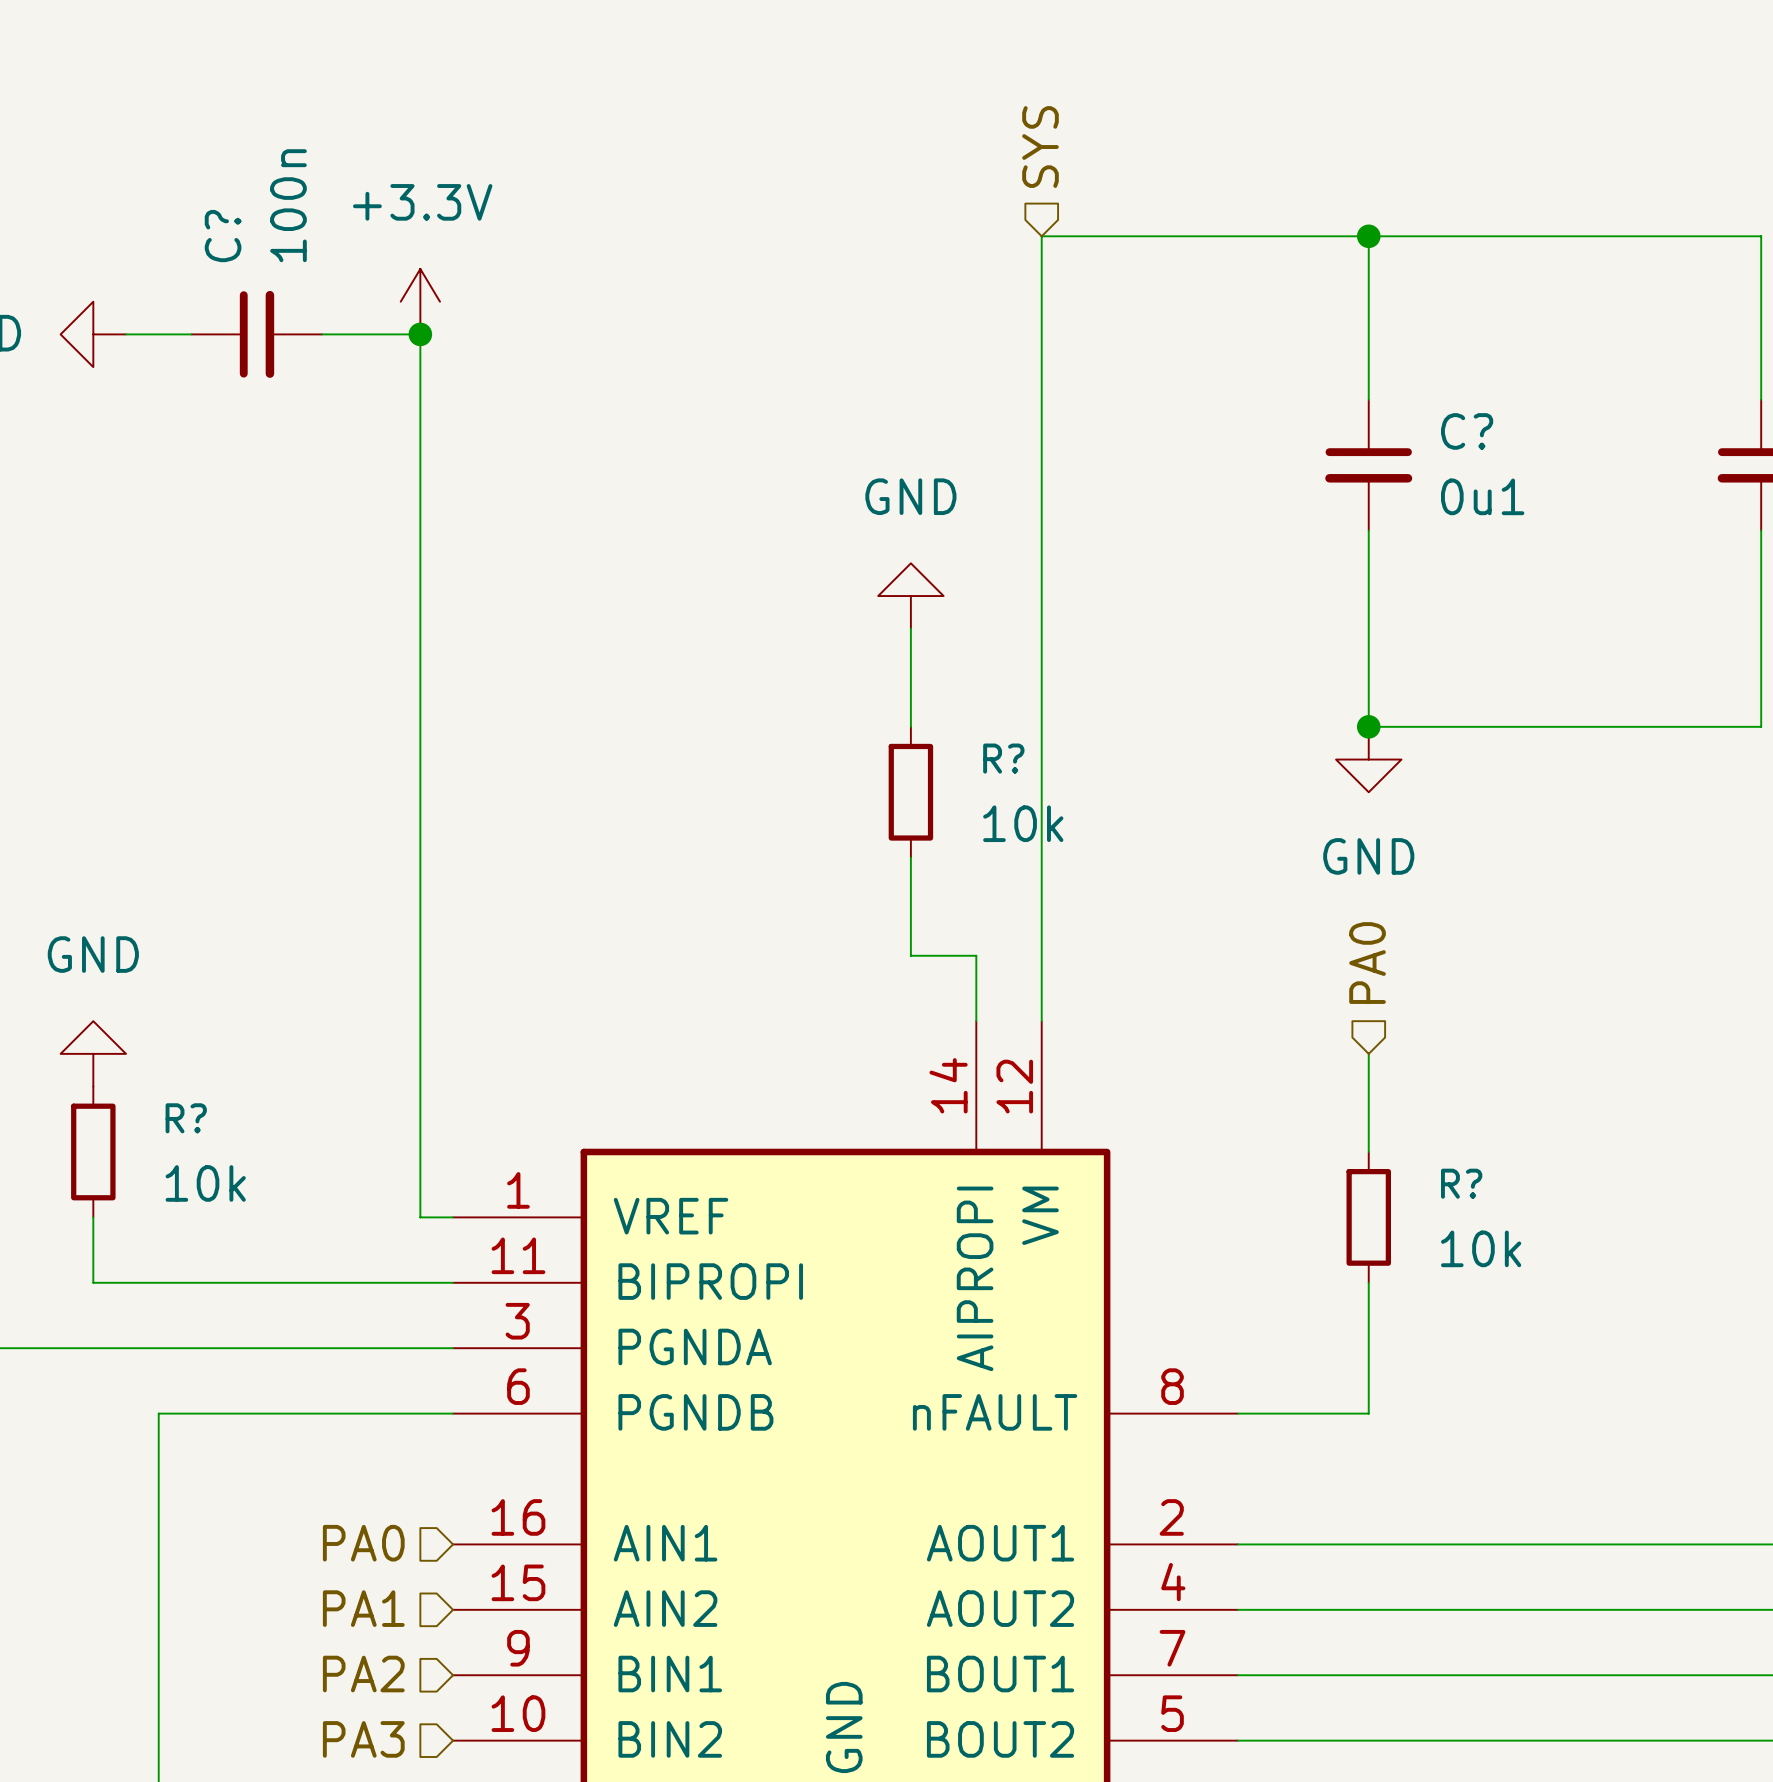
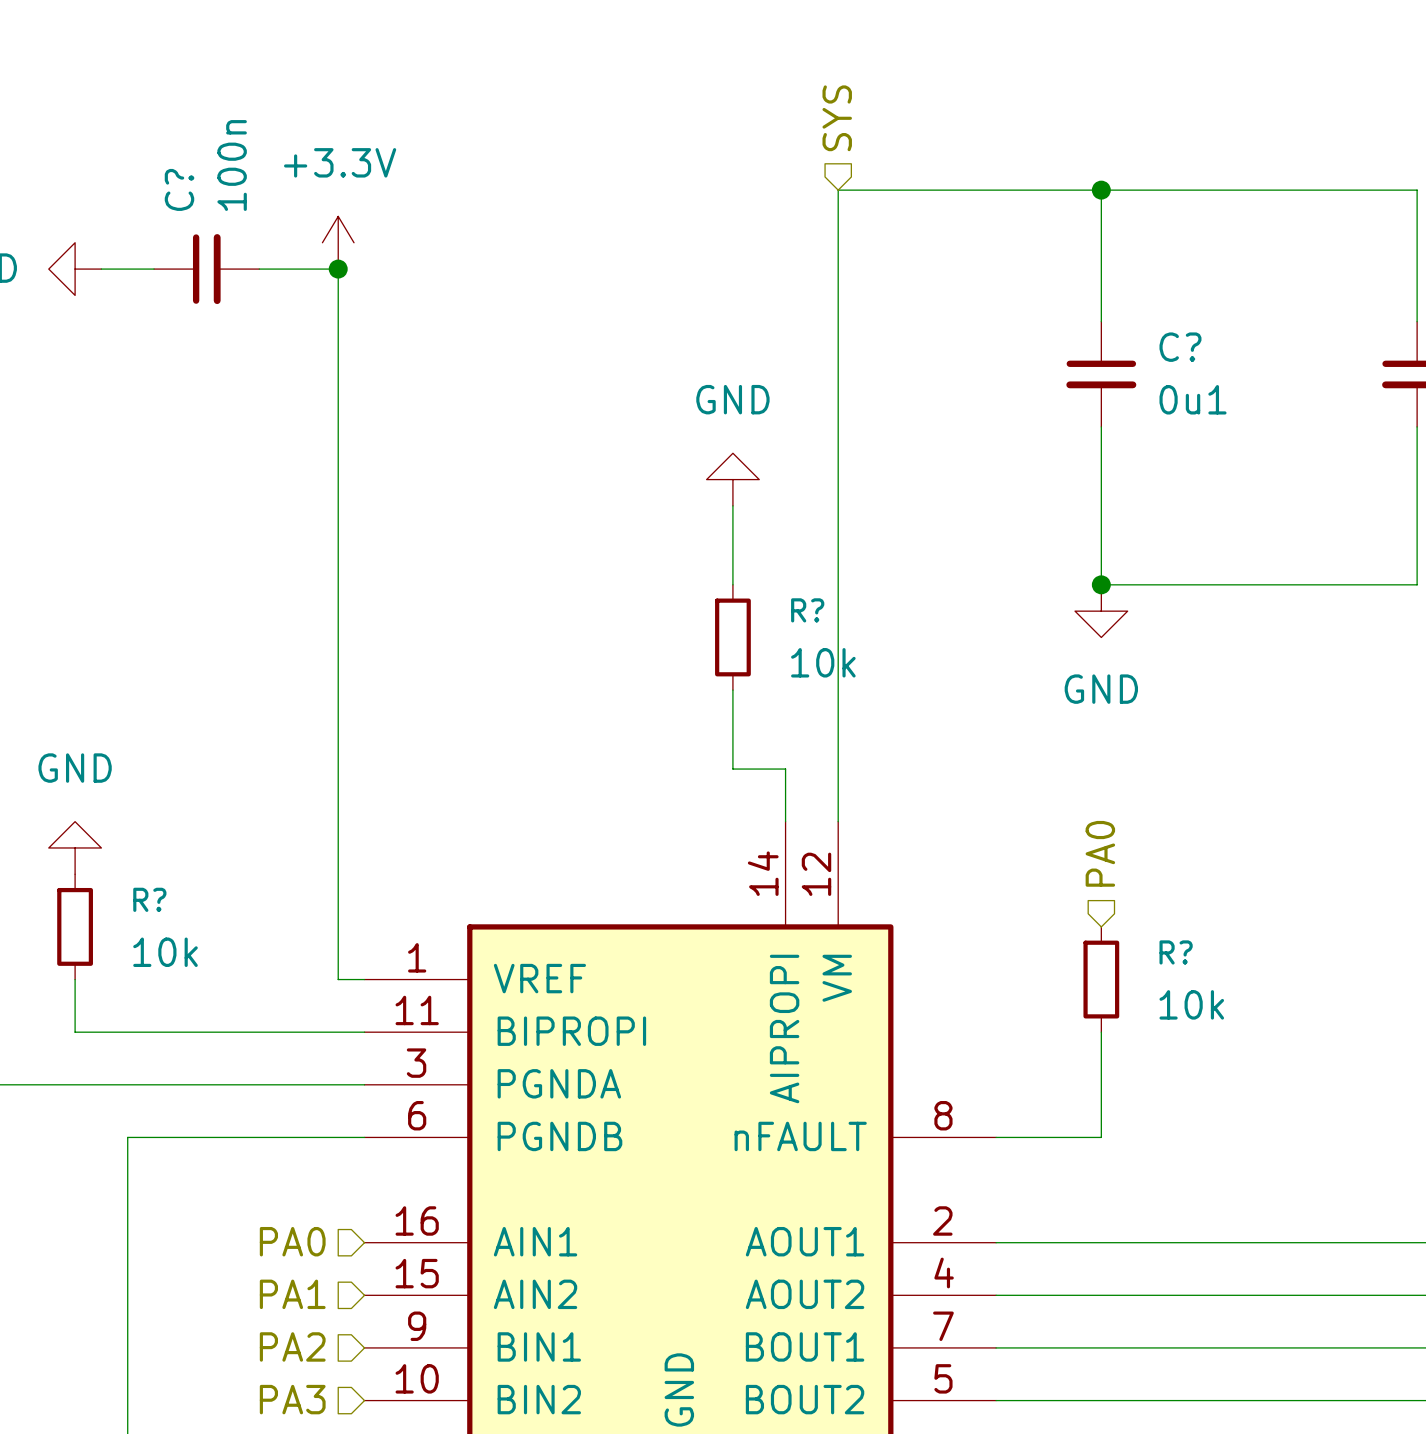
hierarchical label position: PA0 (1367, 963) -> PA0 (1100, 853)
wire: (1368, 1053) (1368, 1151) -> none

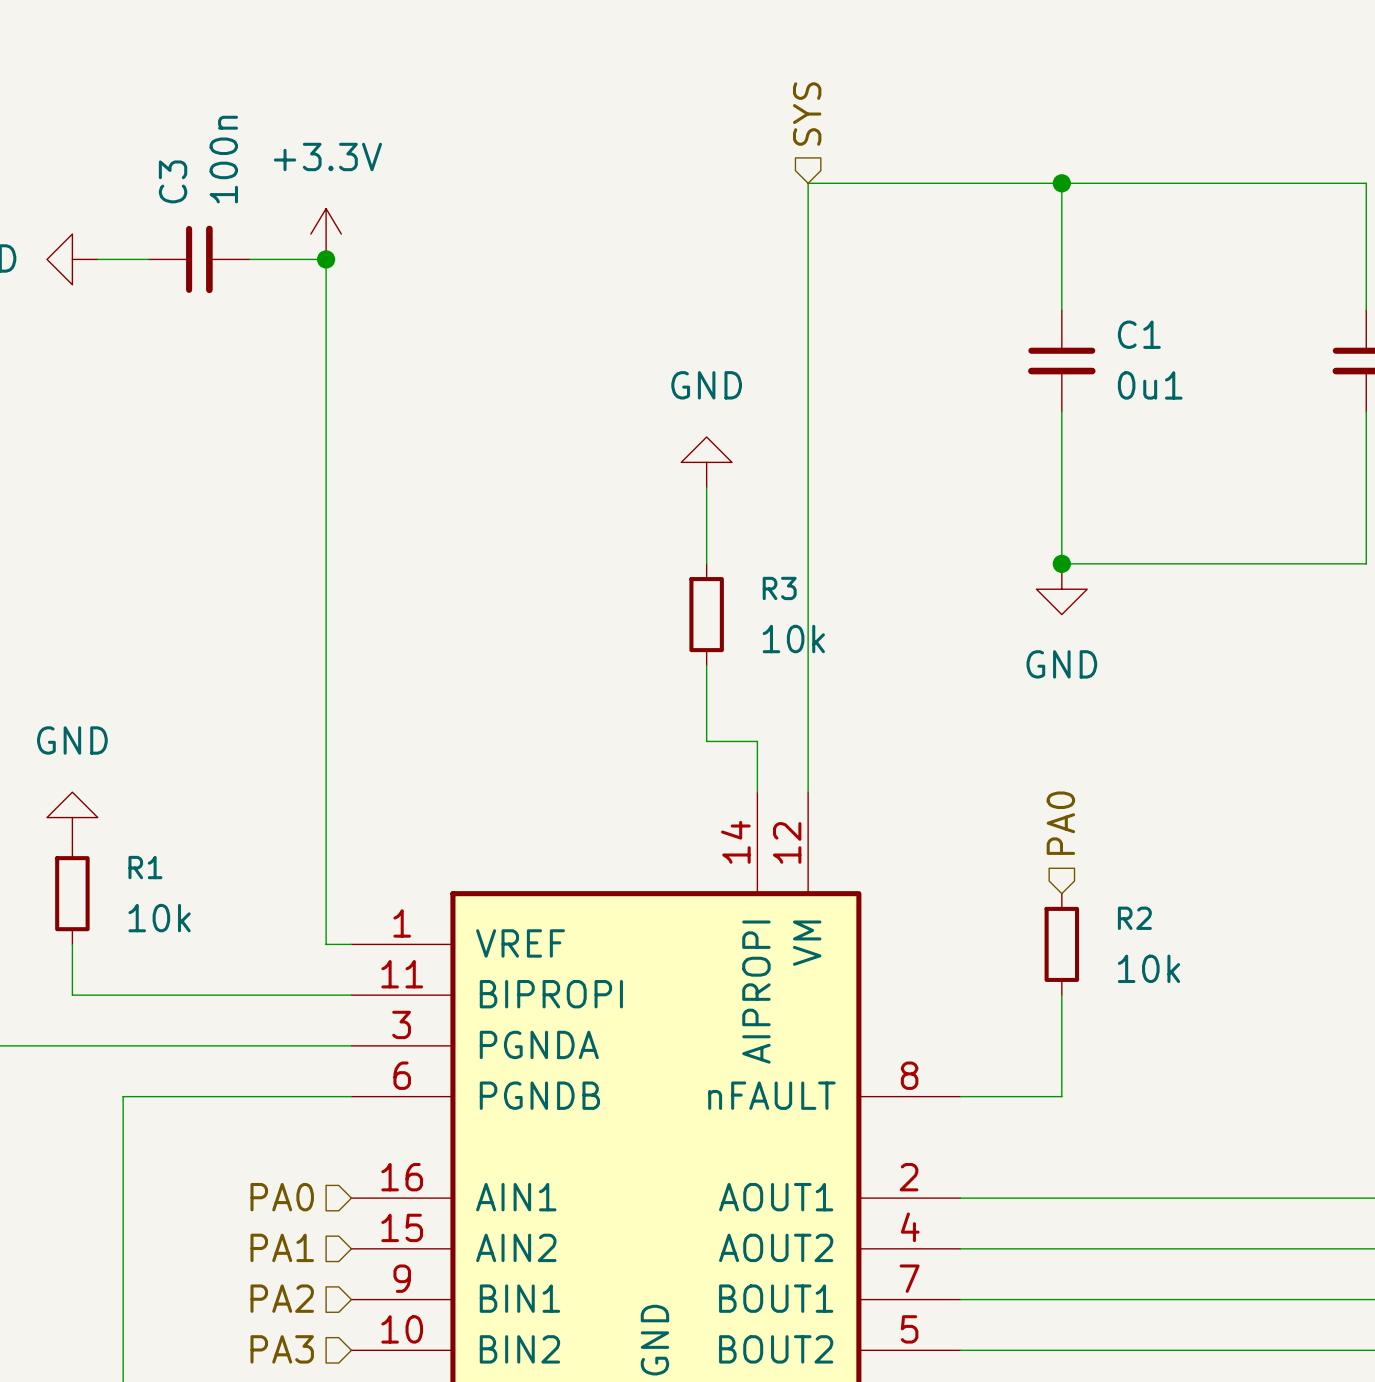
C? name: C? (179, 189) -> C3 (173, 181)
C? name: C? (1180, 347) -> C1 (1139, 334)
R? name: R? (807, 610) -> R3 (779, 588)
R? name: R? (149, 899) -> R1 (145, 867)
R? name: R? (1176, 952) -> R2 (1134, 918)

